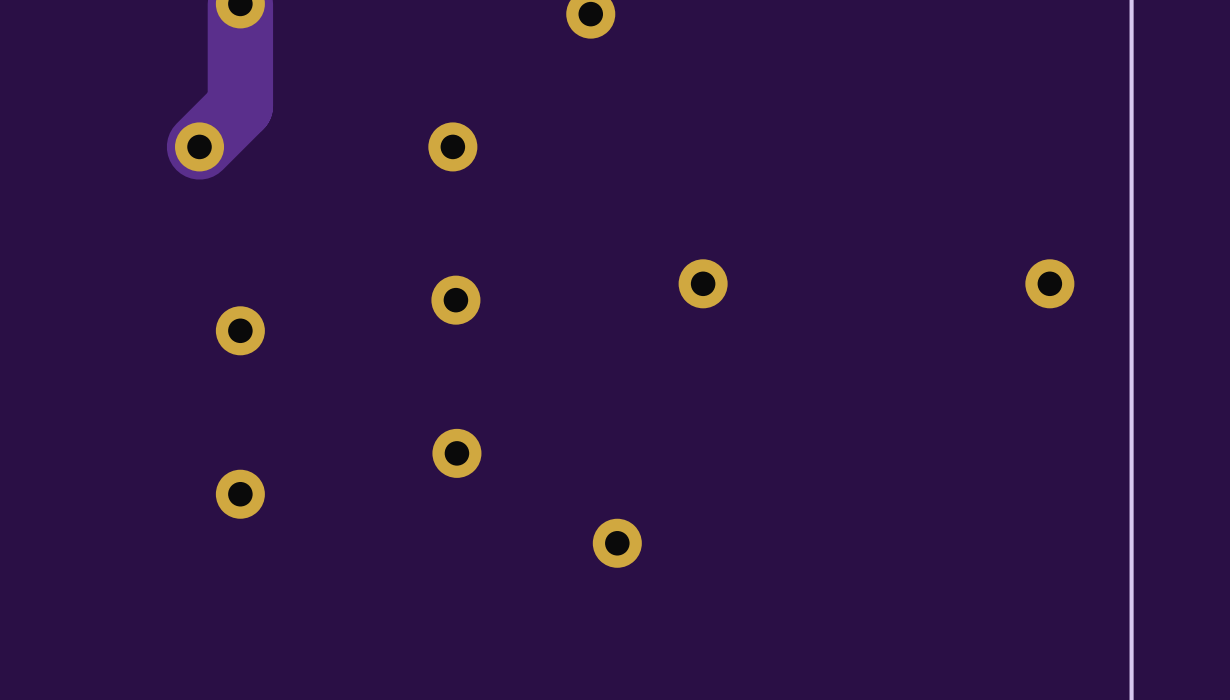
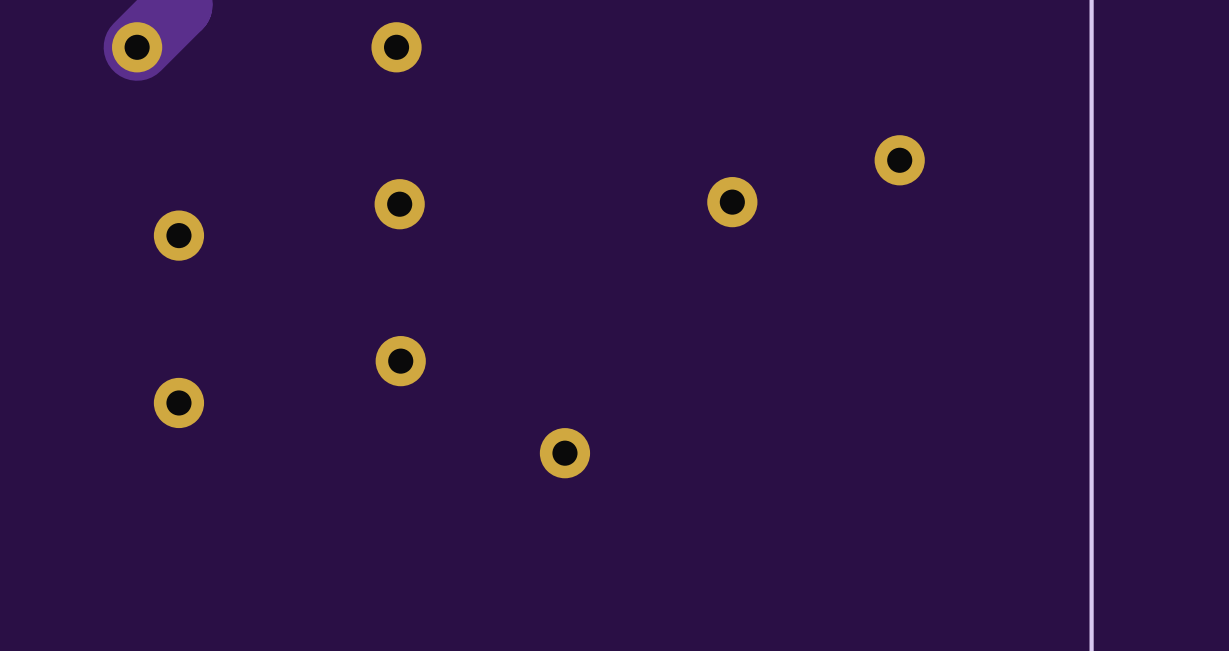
via position: (703, 283) -> (732, 202)
via position: (1049, 283) -> (899, 160)

